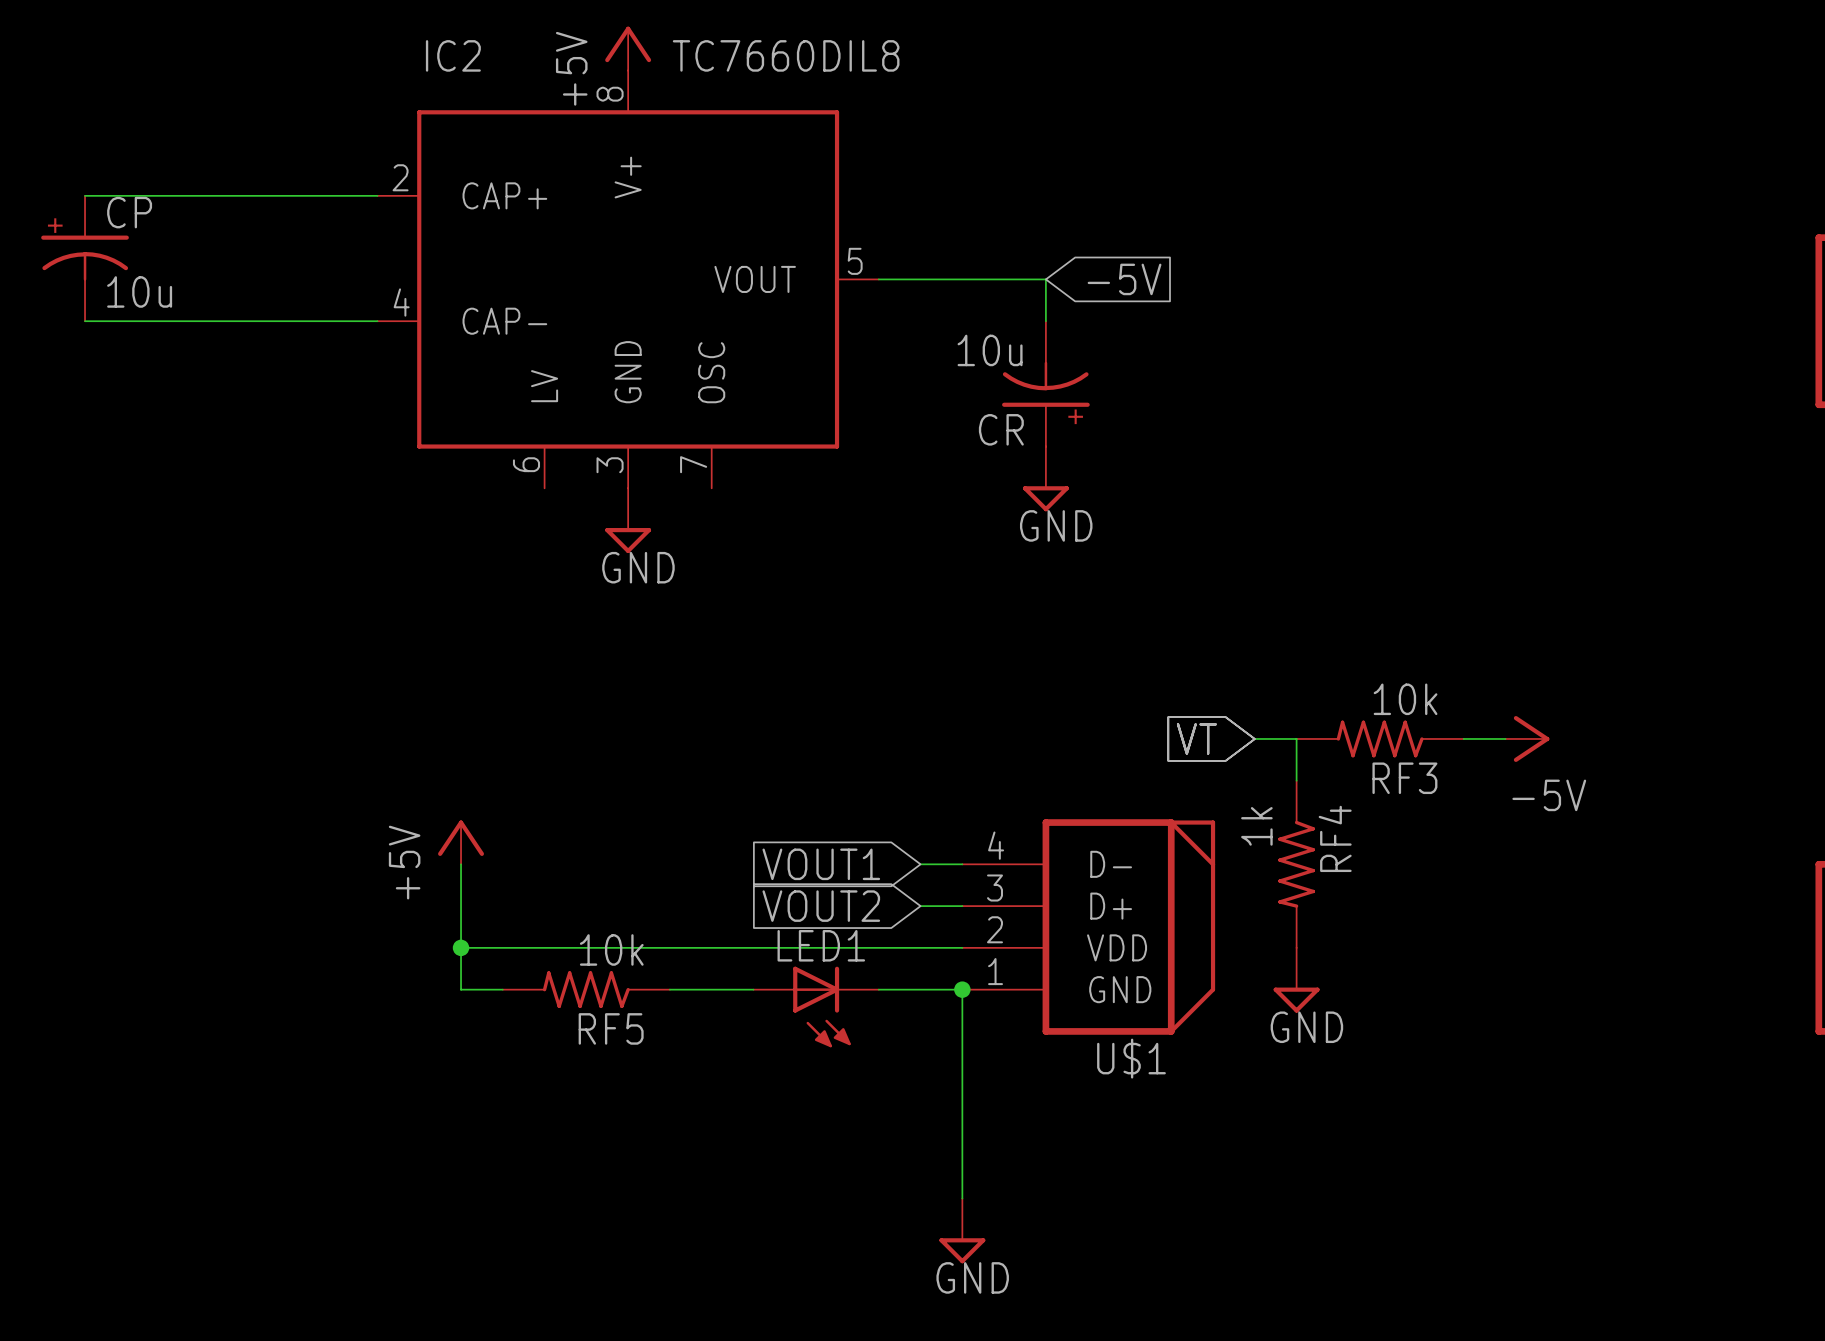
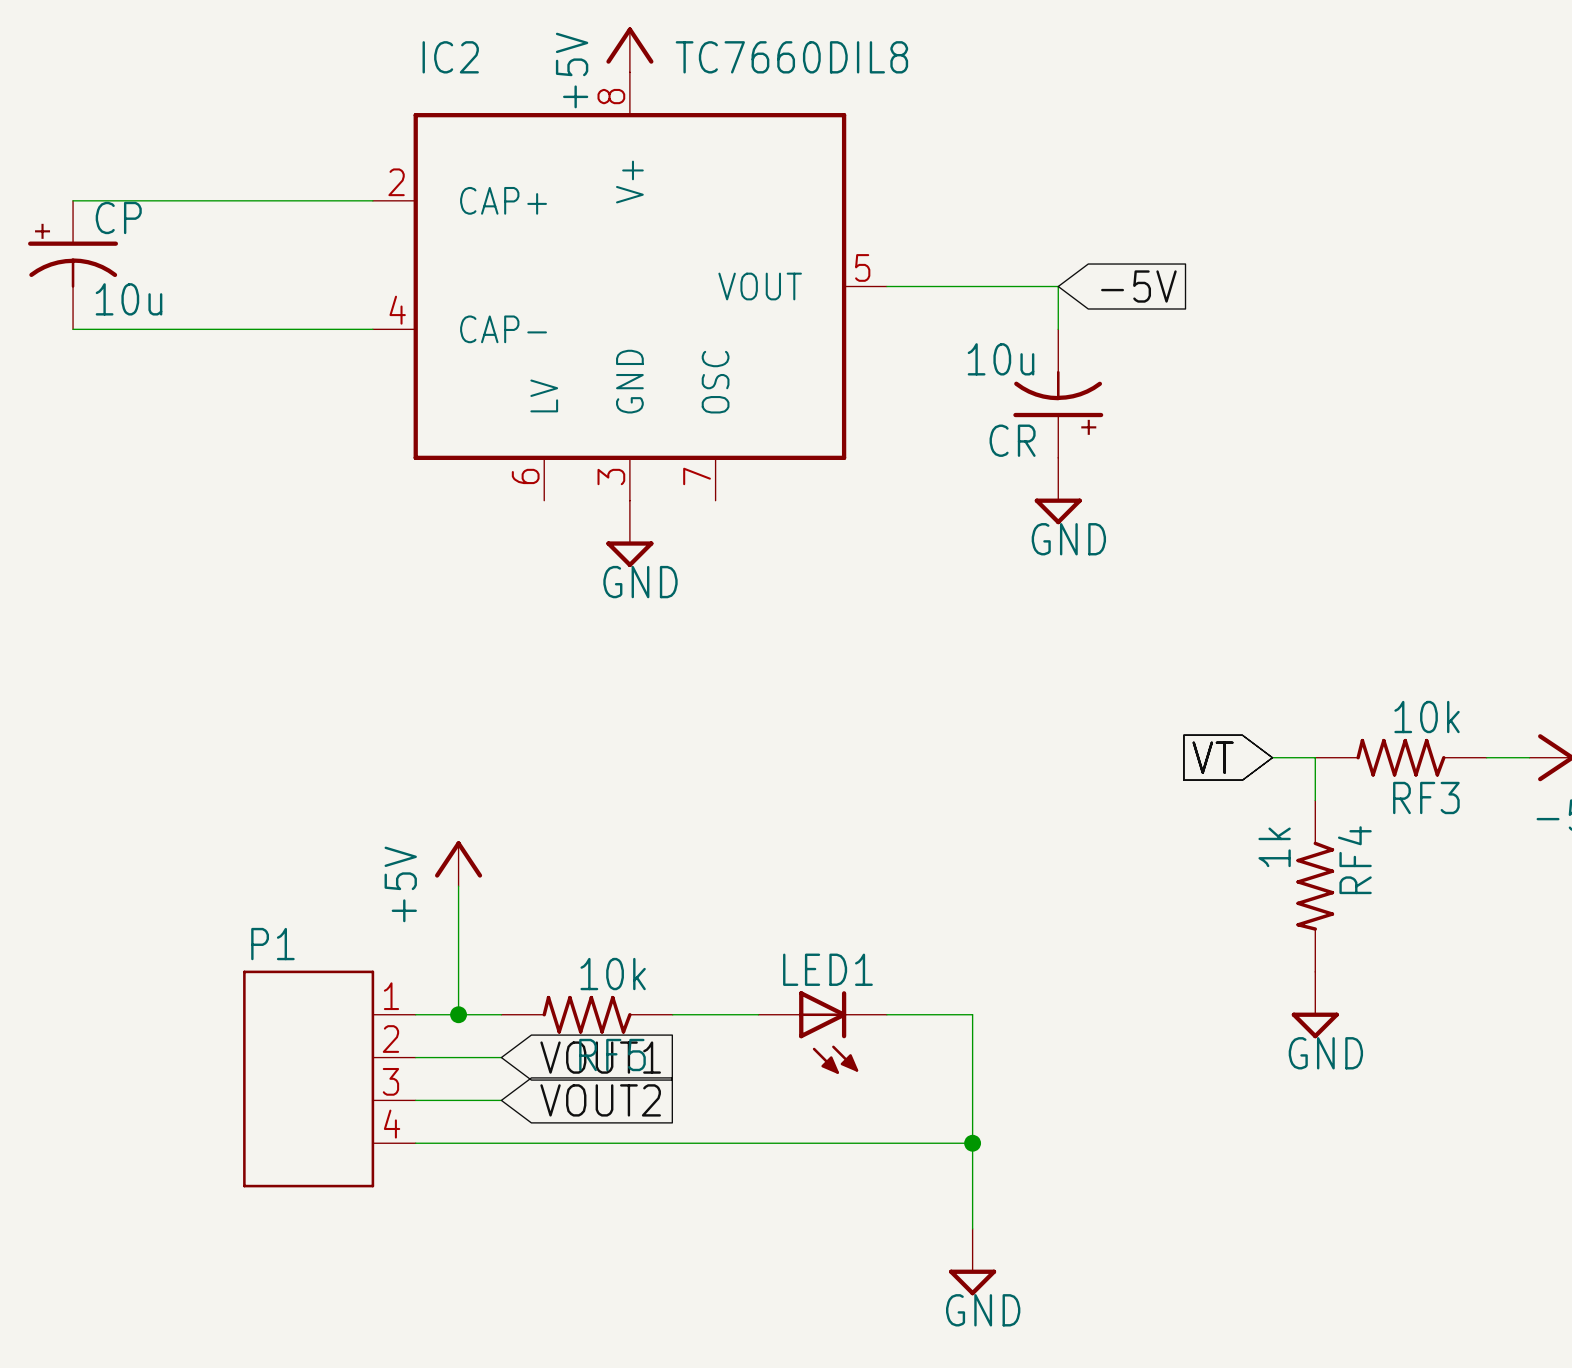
global label: VOUT1 (821, 864) -> none
wire: (920, 864) (962, 864) -> none
global label: VOUT2 (821, 906) -> none
wire: (920, 906) (962, 906) -> none
U$1: (1088, 926) -> none
wire: (461, 947) (962, 947) -> none
junction position: (461, 947) -> (458, 1014)
wire: none -> (415, 1014) (458, 1014)
junction: (962, 989) -> none
wire: none -> (415, 1057) (501, 1057)
global label: none -> VOUT1 (600, 1057)
P1: none -> (329, 1078)
wire: none -> (415, 1100) (501, 1100)
global label: none -> VOUT2 (600, 1100)
wire: none -> (415, 1143) (972, 1143)
junction: none -> (972, 1143)

